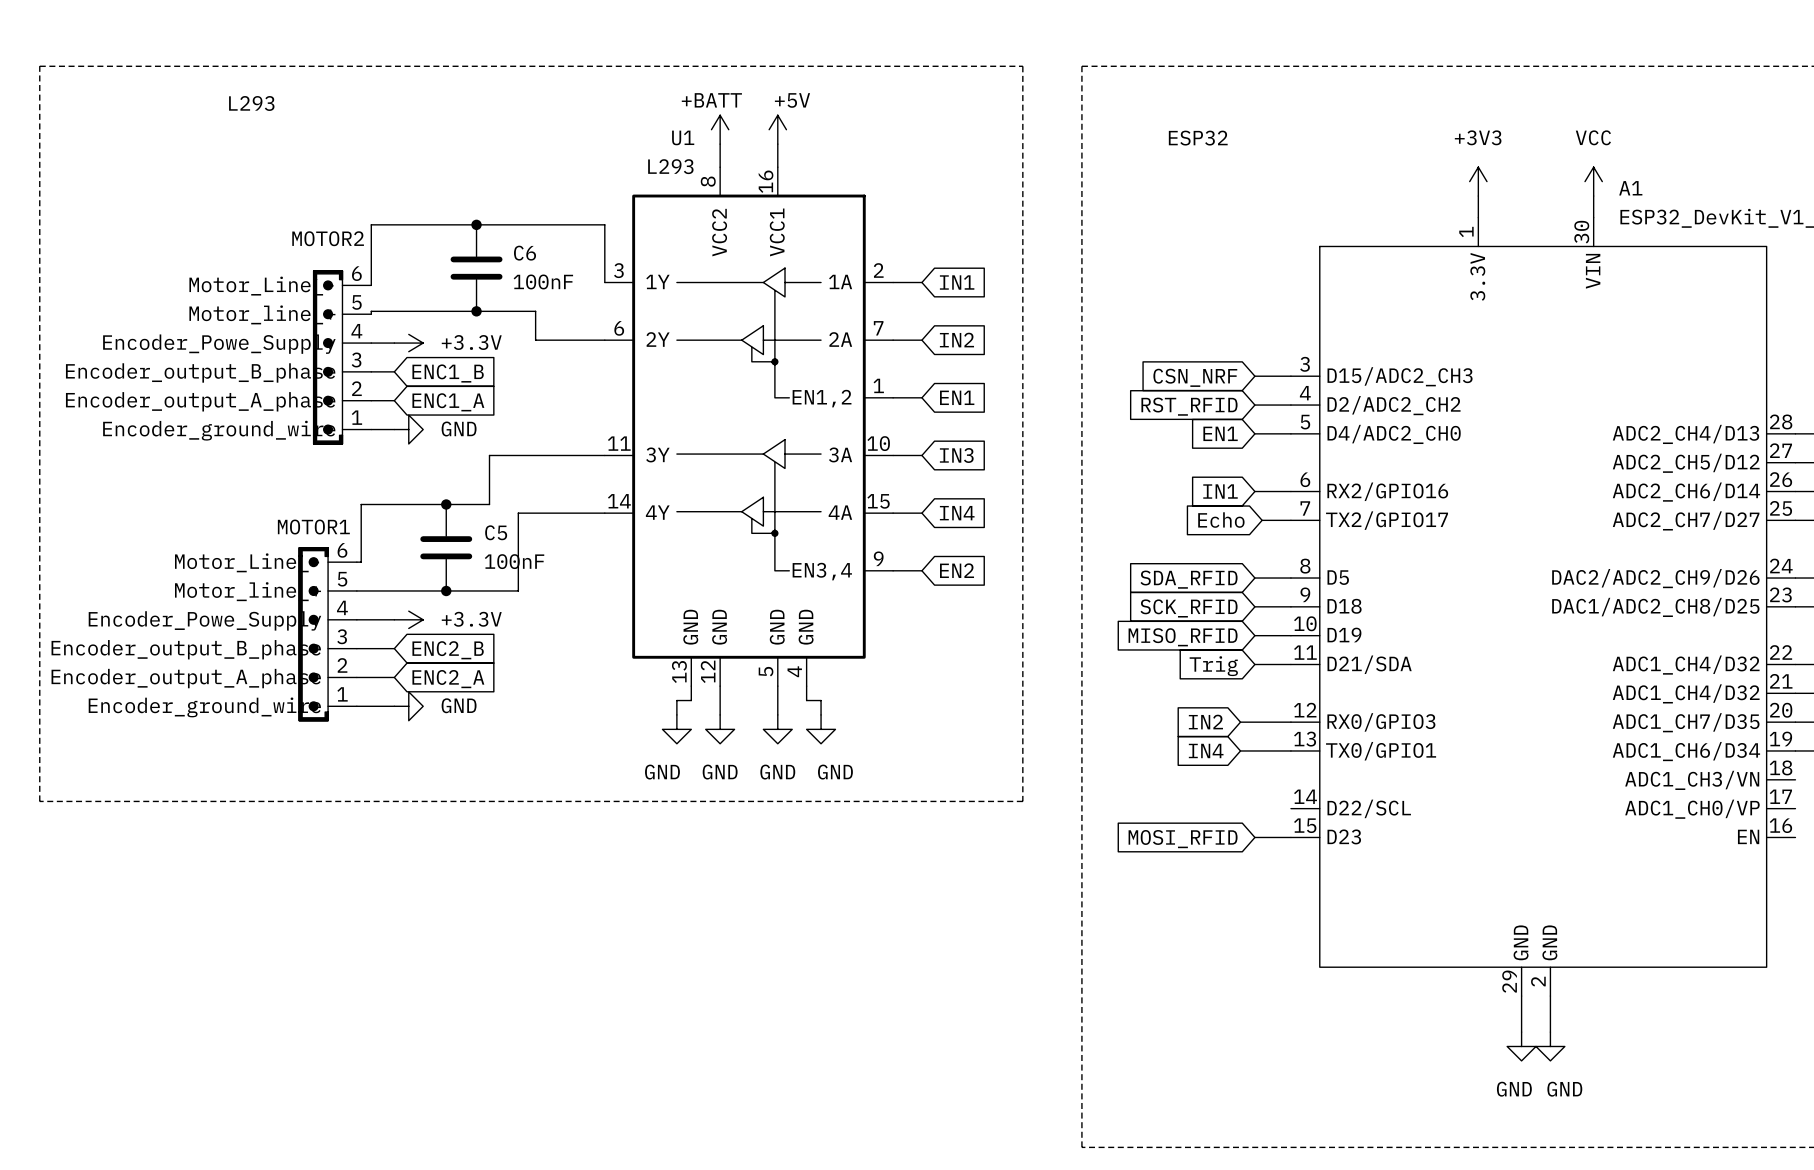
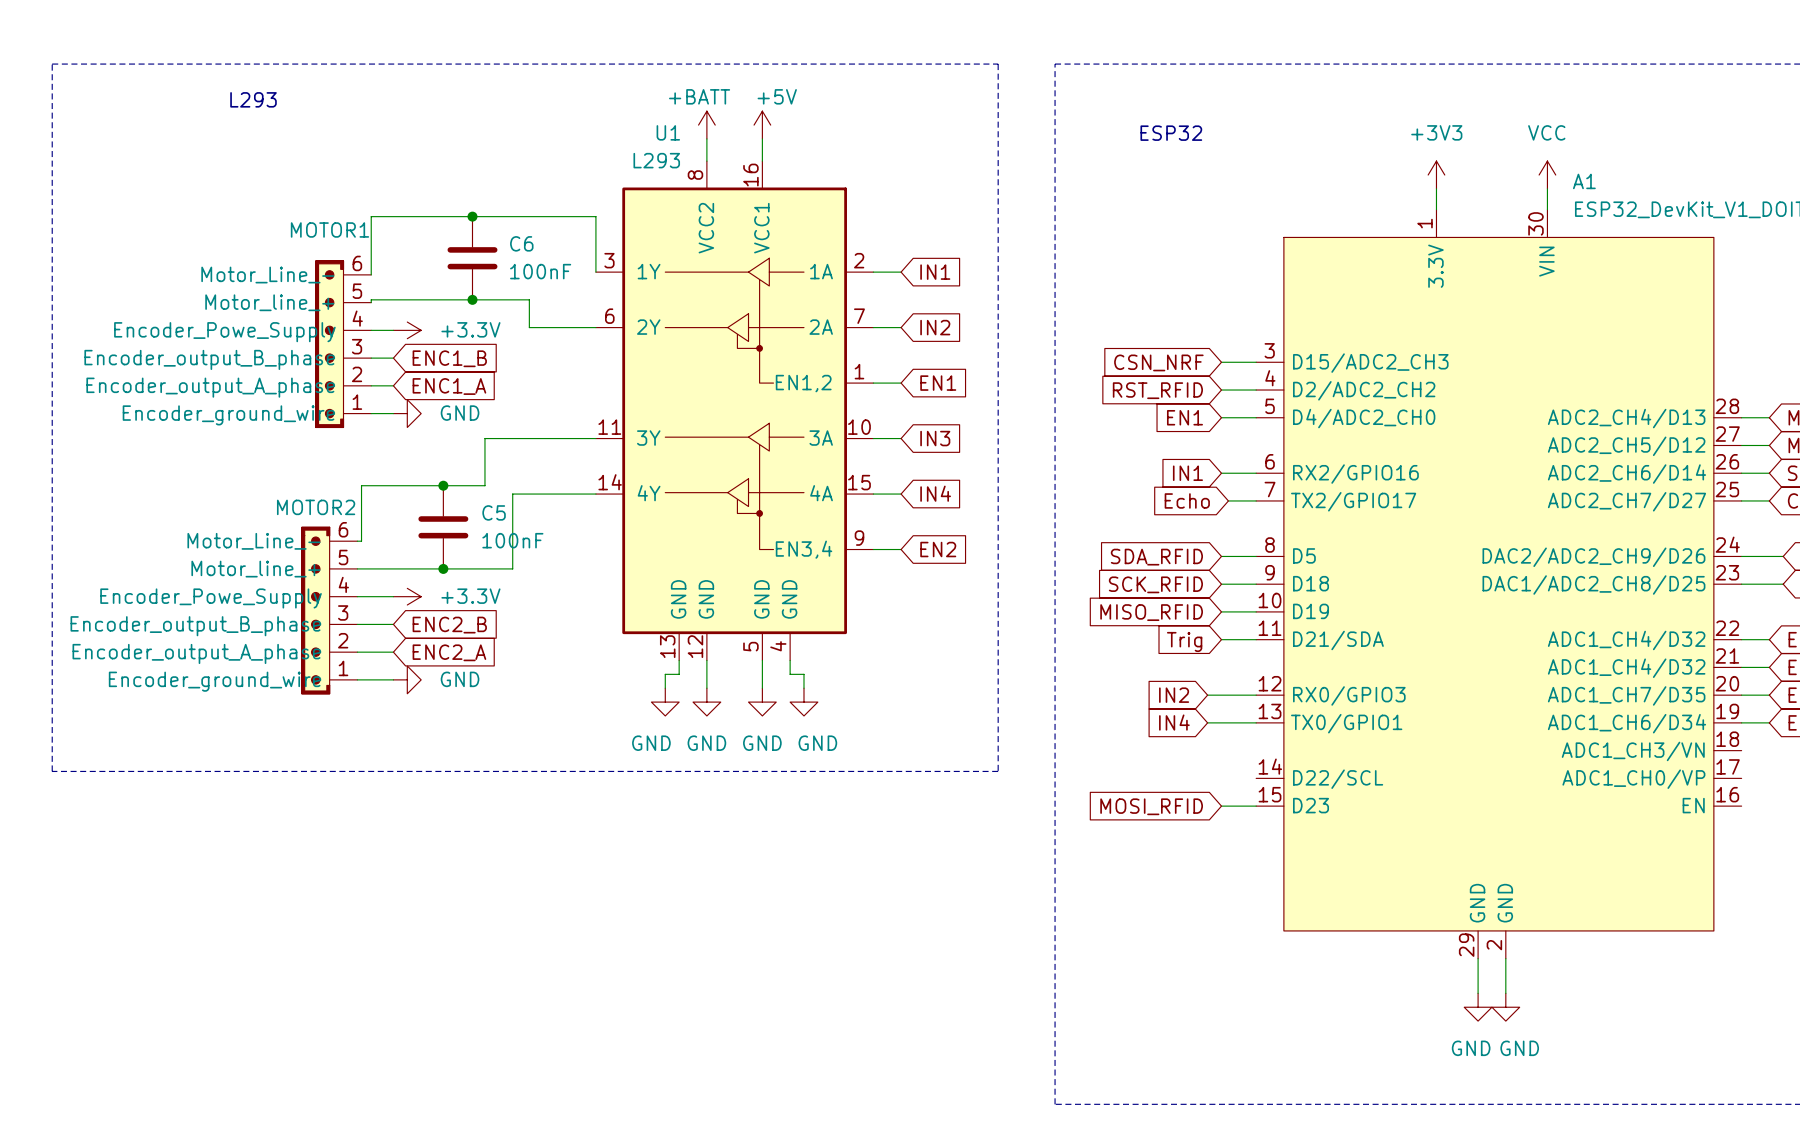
MOTOR2 name: MOTOR2 (328, 238) -> MOTOR1 (329, 229)
MOTOR1 name: MOTOR1 (313, 527) -> MOTOR2 (316, 507)

